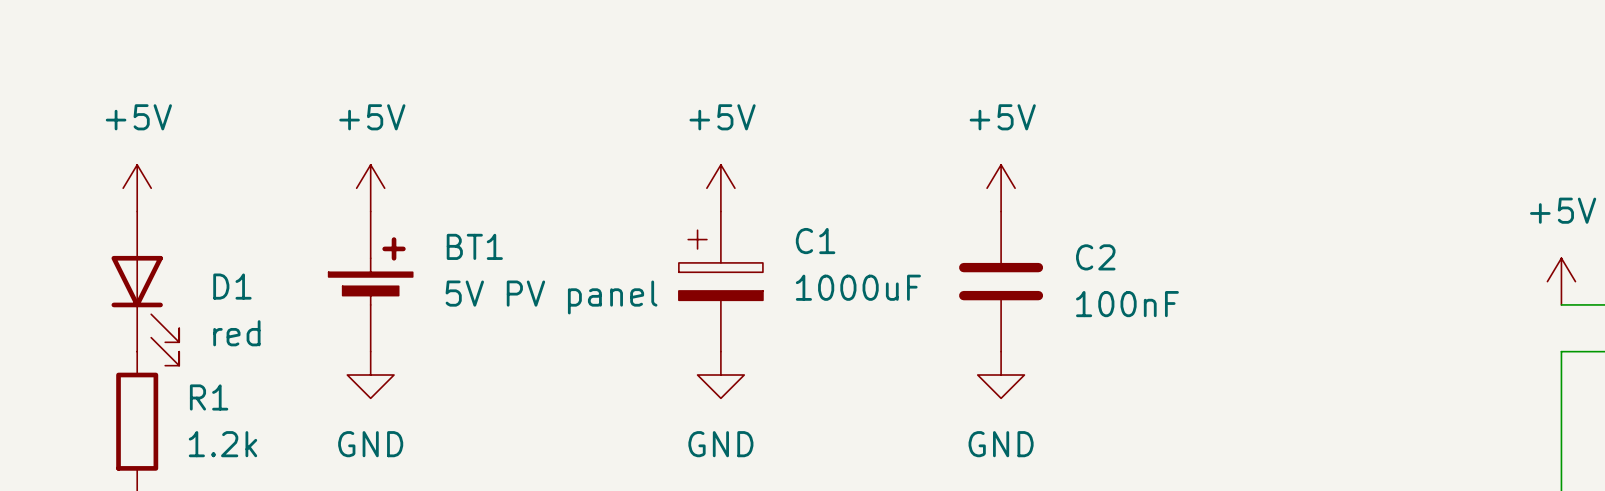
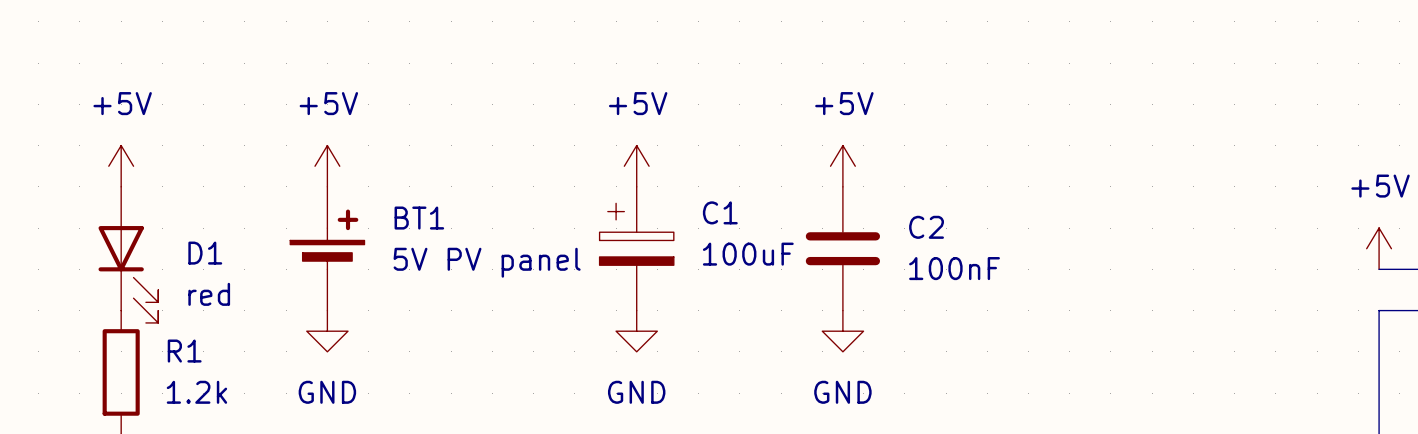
power symbol position: +5V (1001, 188) -> +5V (842, 166)
C2 position: (1001, 281) -> (842, 248)
C1 value: 1000uF (858, 287) -> 100uF (748, 254)
power symbol position: GND (1001, 375) -> GND (842, 331)

